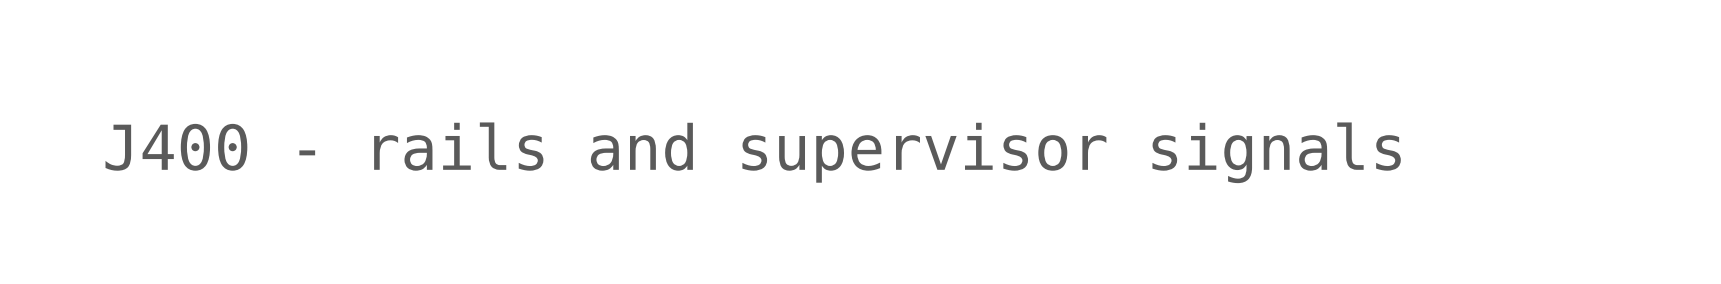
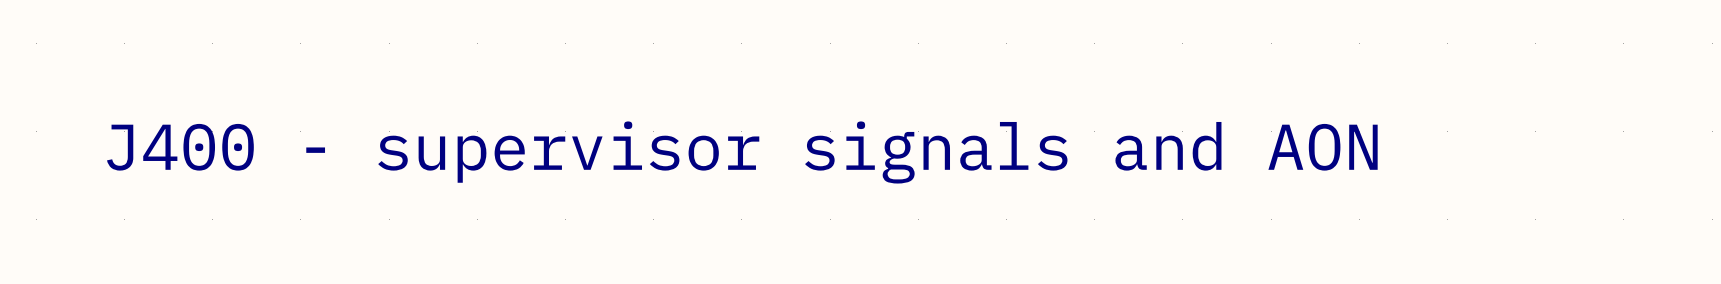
text: J400 - rails and supervisor signals (753, 152) -> J400 - supervisor signals and AON (742, 152)

